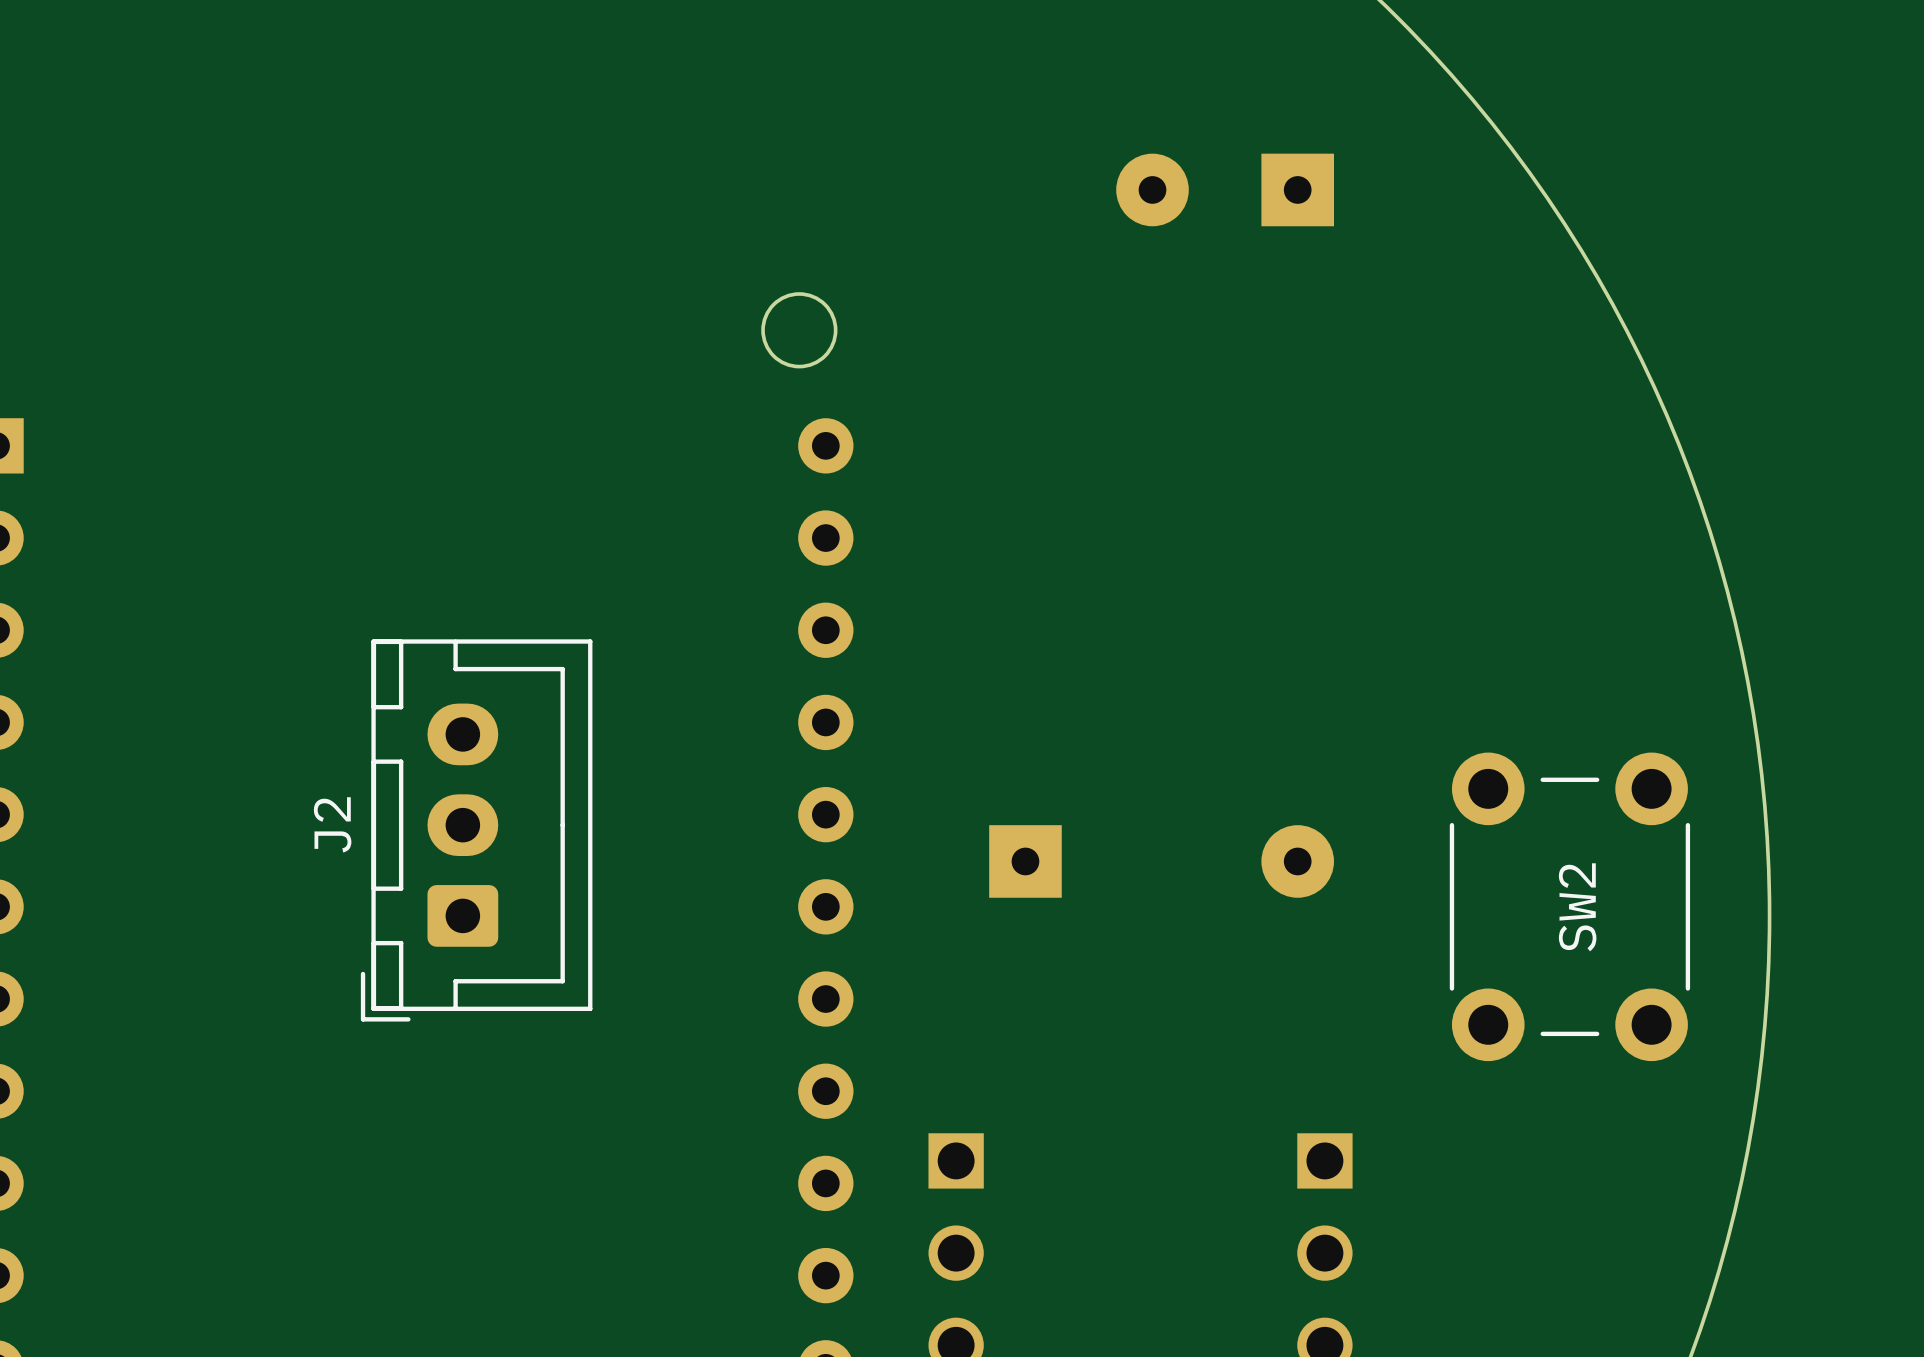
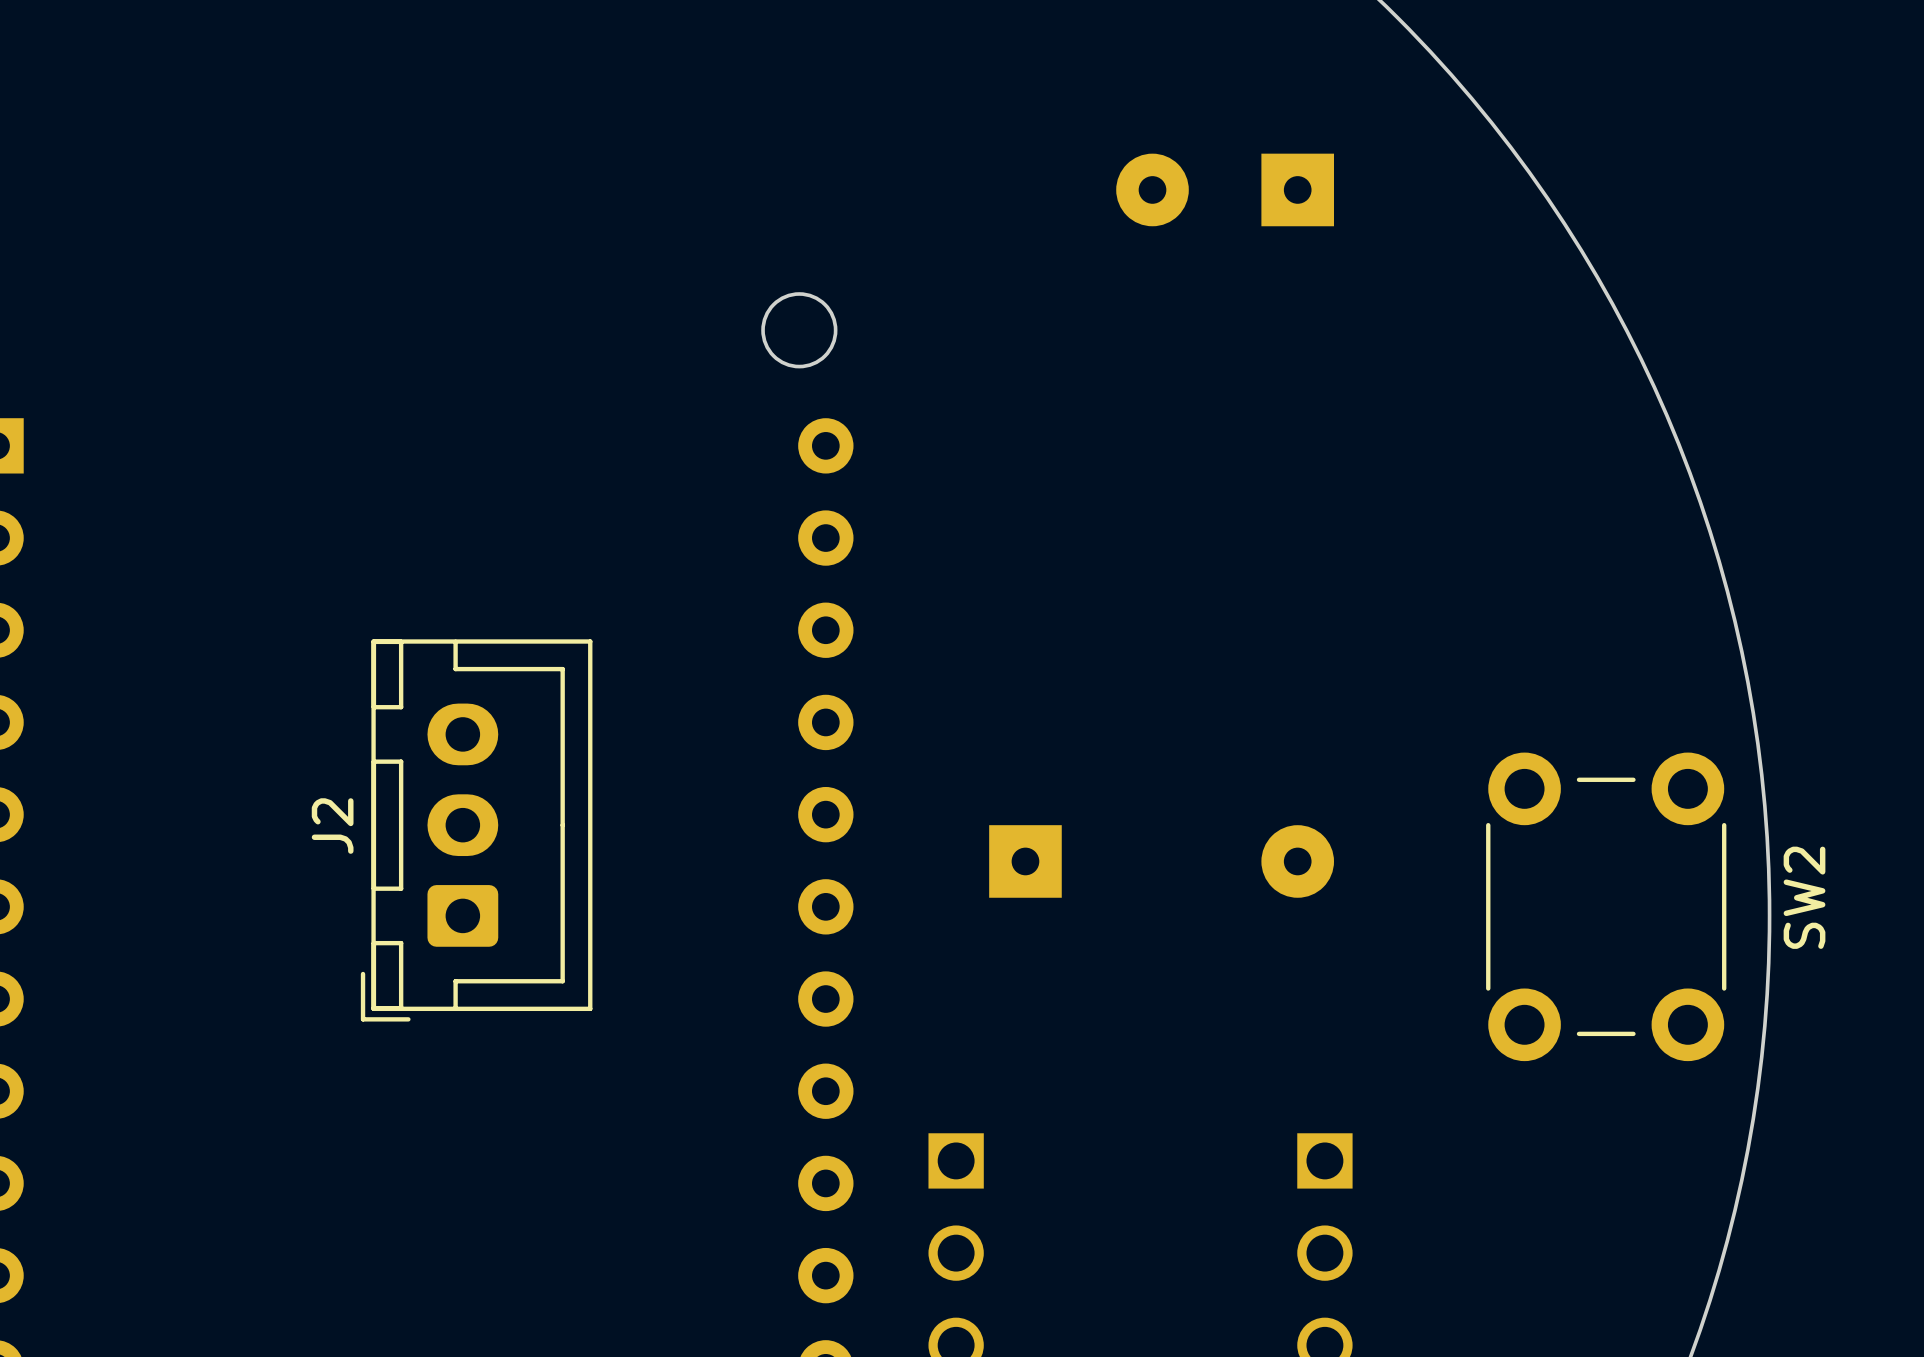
SW2 position: (1569, 906) -> (1606, 906)
SW2 name position: SW2 (1577, 907) -> SW2 (1804, 897)

